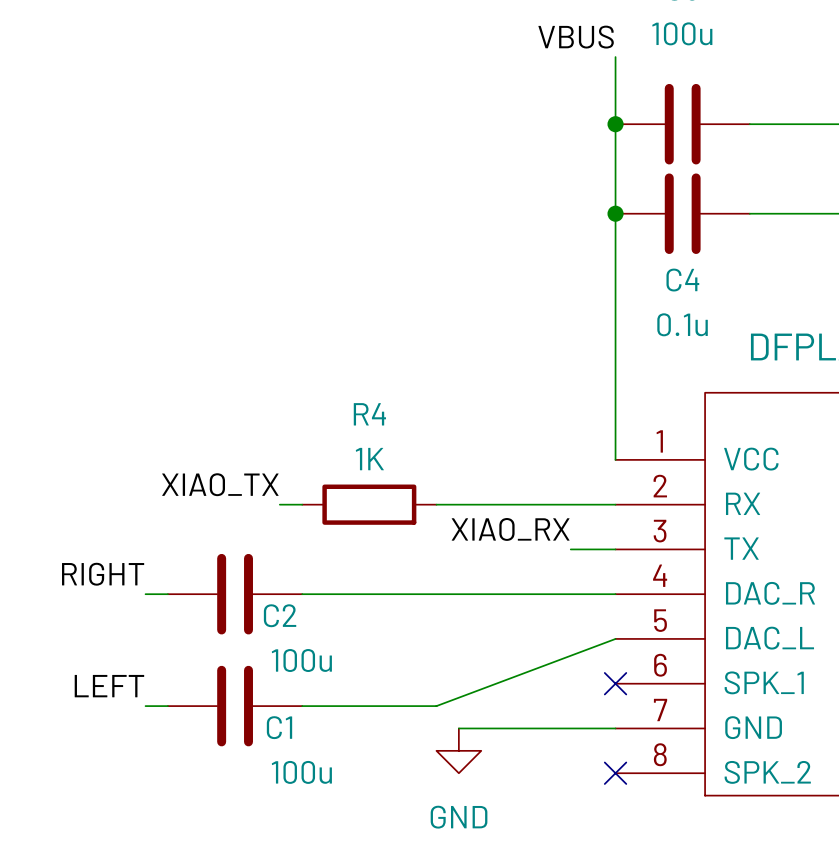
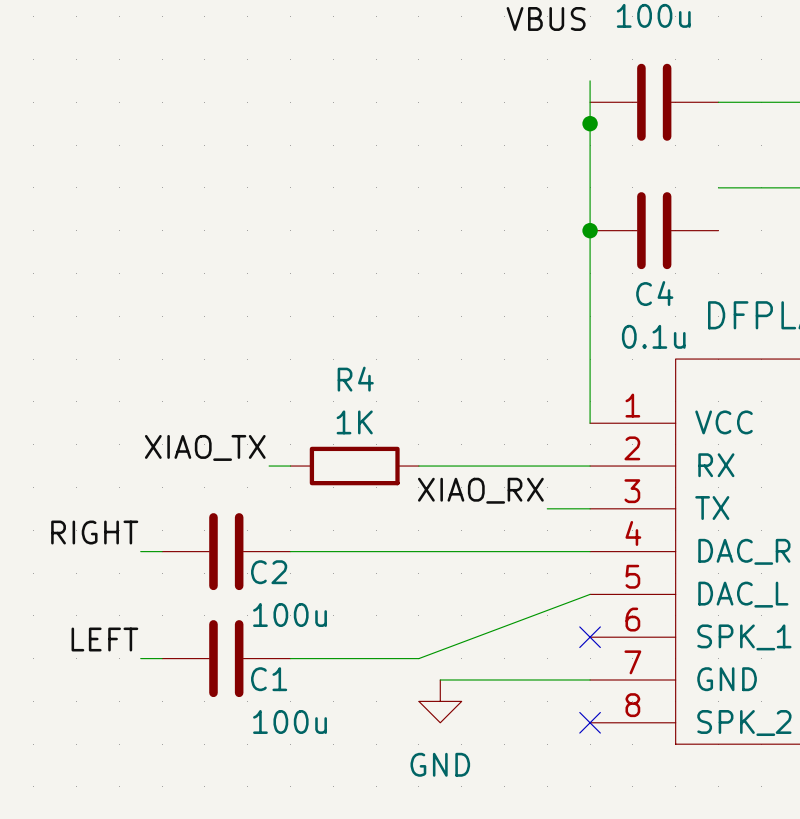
wire: (615, 57) (615, 101) -> none
junction position: (615, 124) -> (590, 123)
junction: (615, 213) -> none
C4 position: (682, 213) -> (654, 230)
junction: none -> (590, 230)

